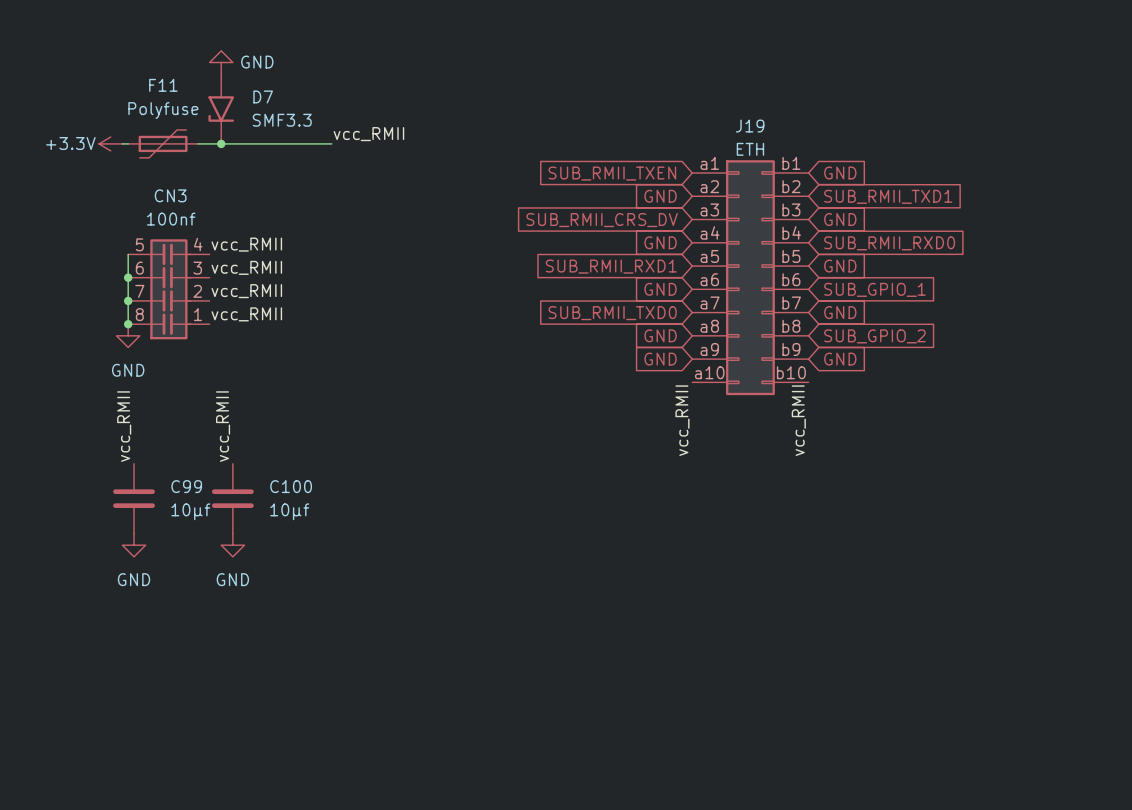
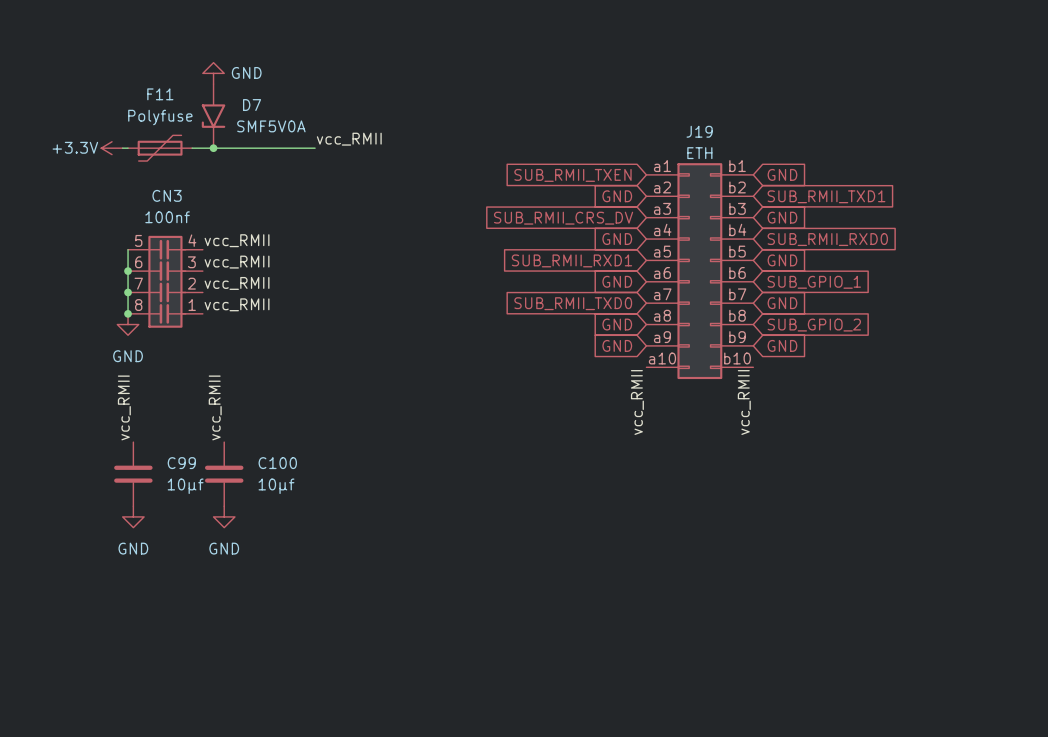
D7 value: SMF3.3 (282, 120) -> SMF5V0A (271, 126)

